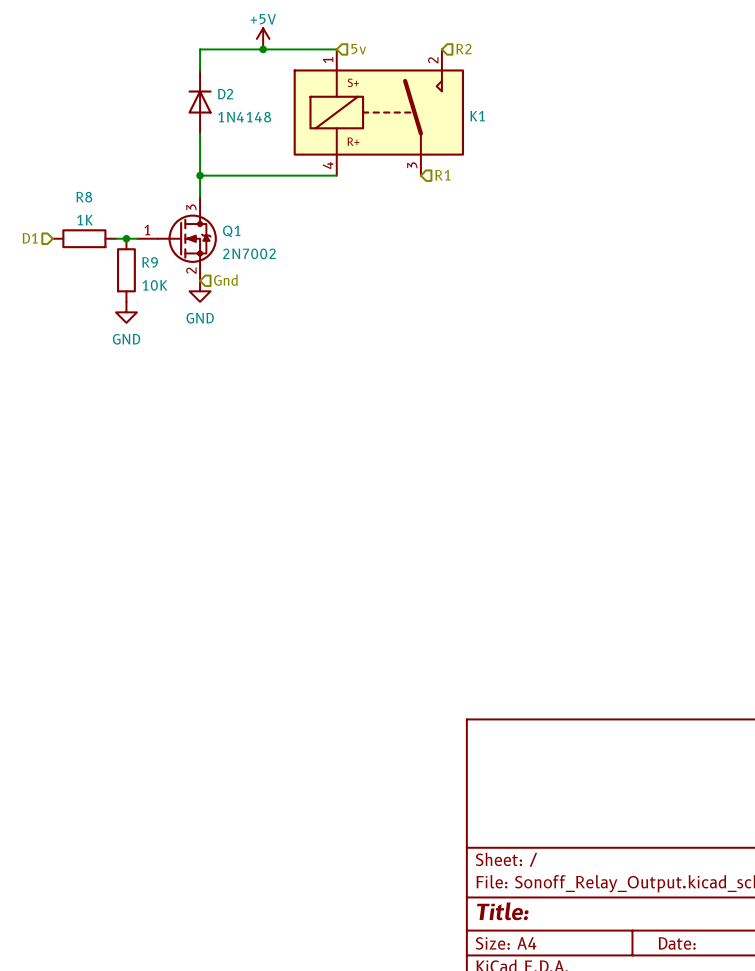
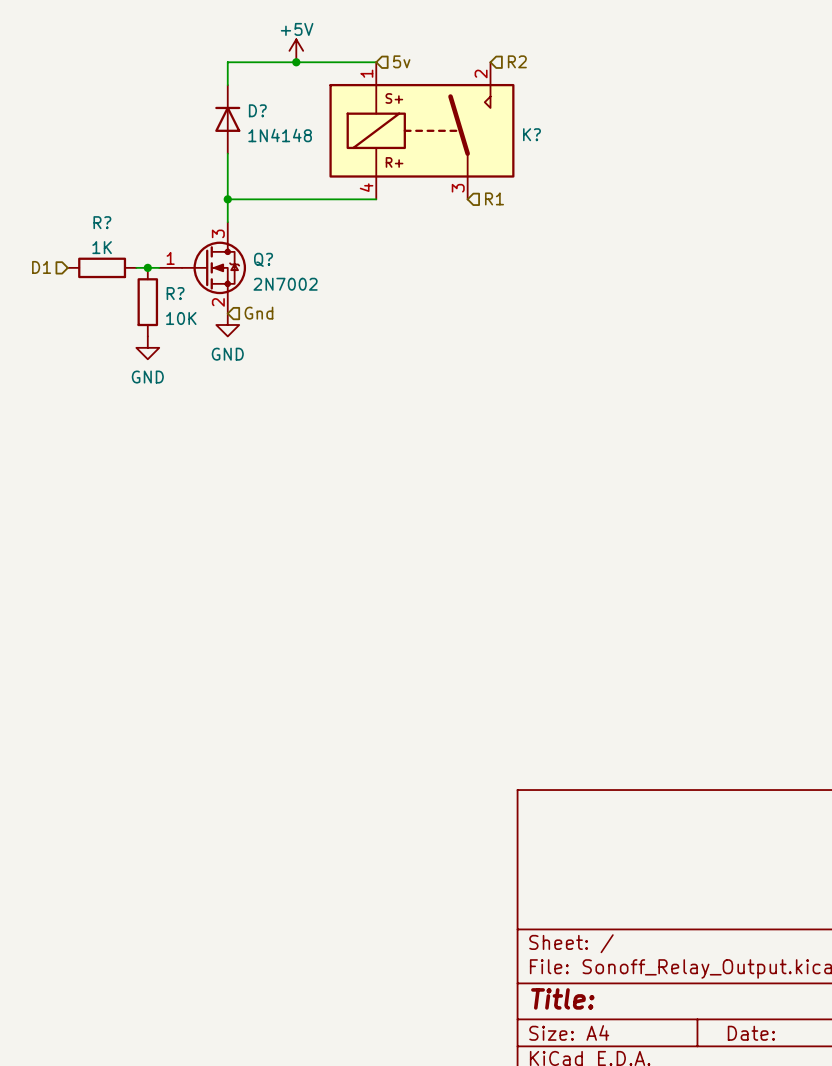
D2 name: D2 (225, 94) -> D? (257, 110)
K1 name: K1 (477, 116) -> K? (531, 134)
R8 name: R8 (84, 197) -> R? (102, 222)
Q1 name: Q1 (231, 231) -> Q? (263, 259)
R9 name: R9 (150, 262) -> R? (175, 293)

